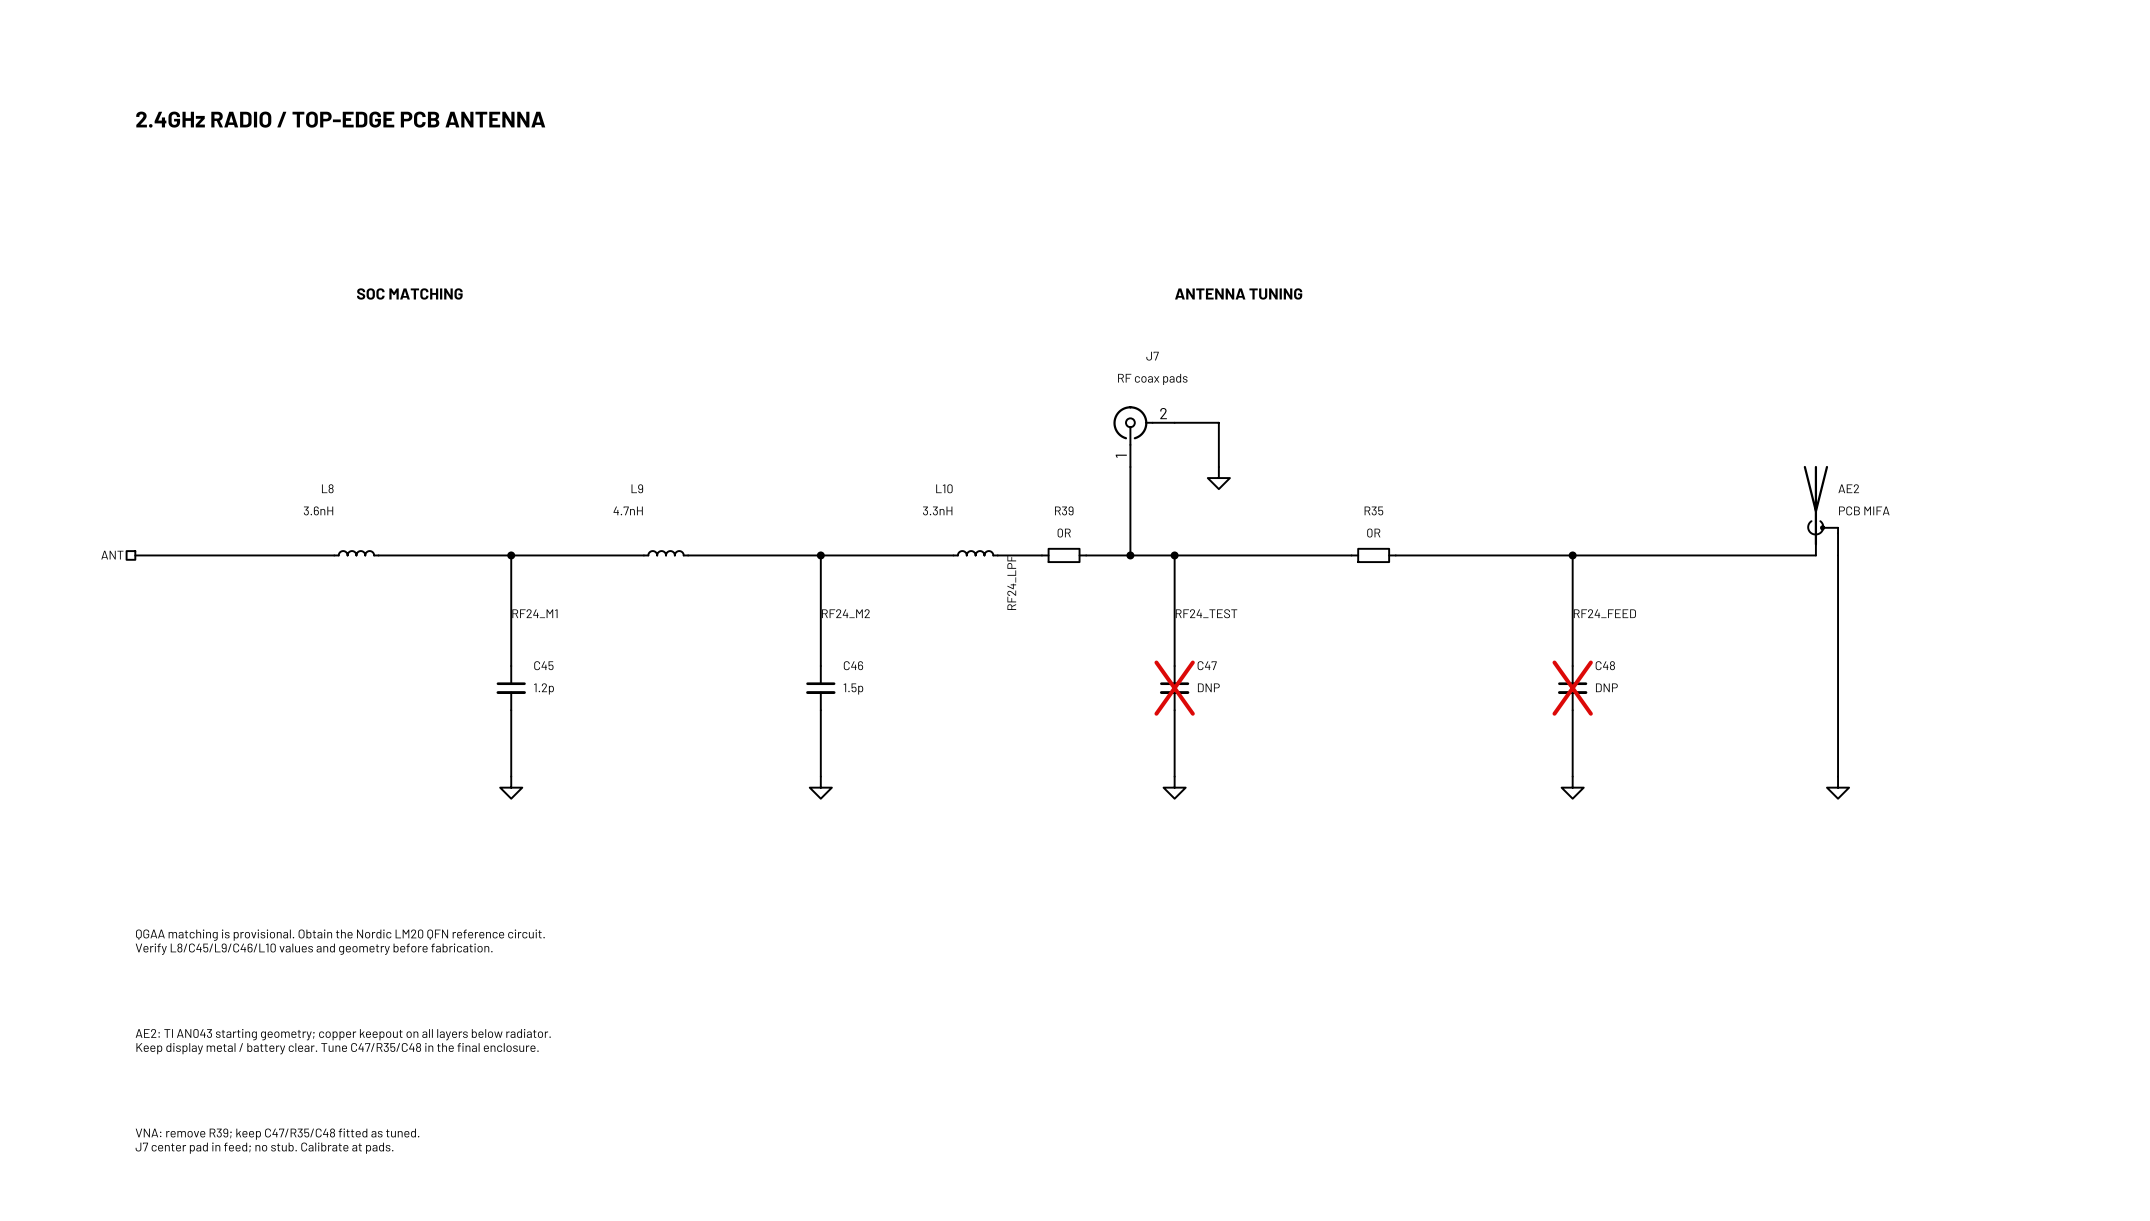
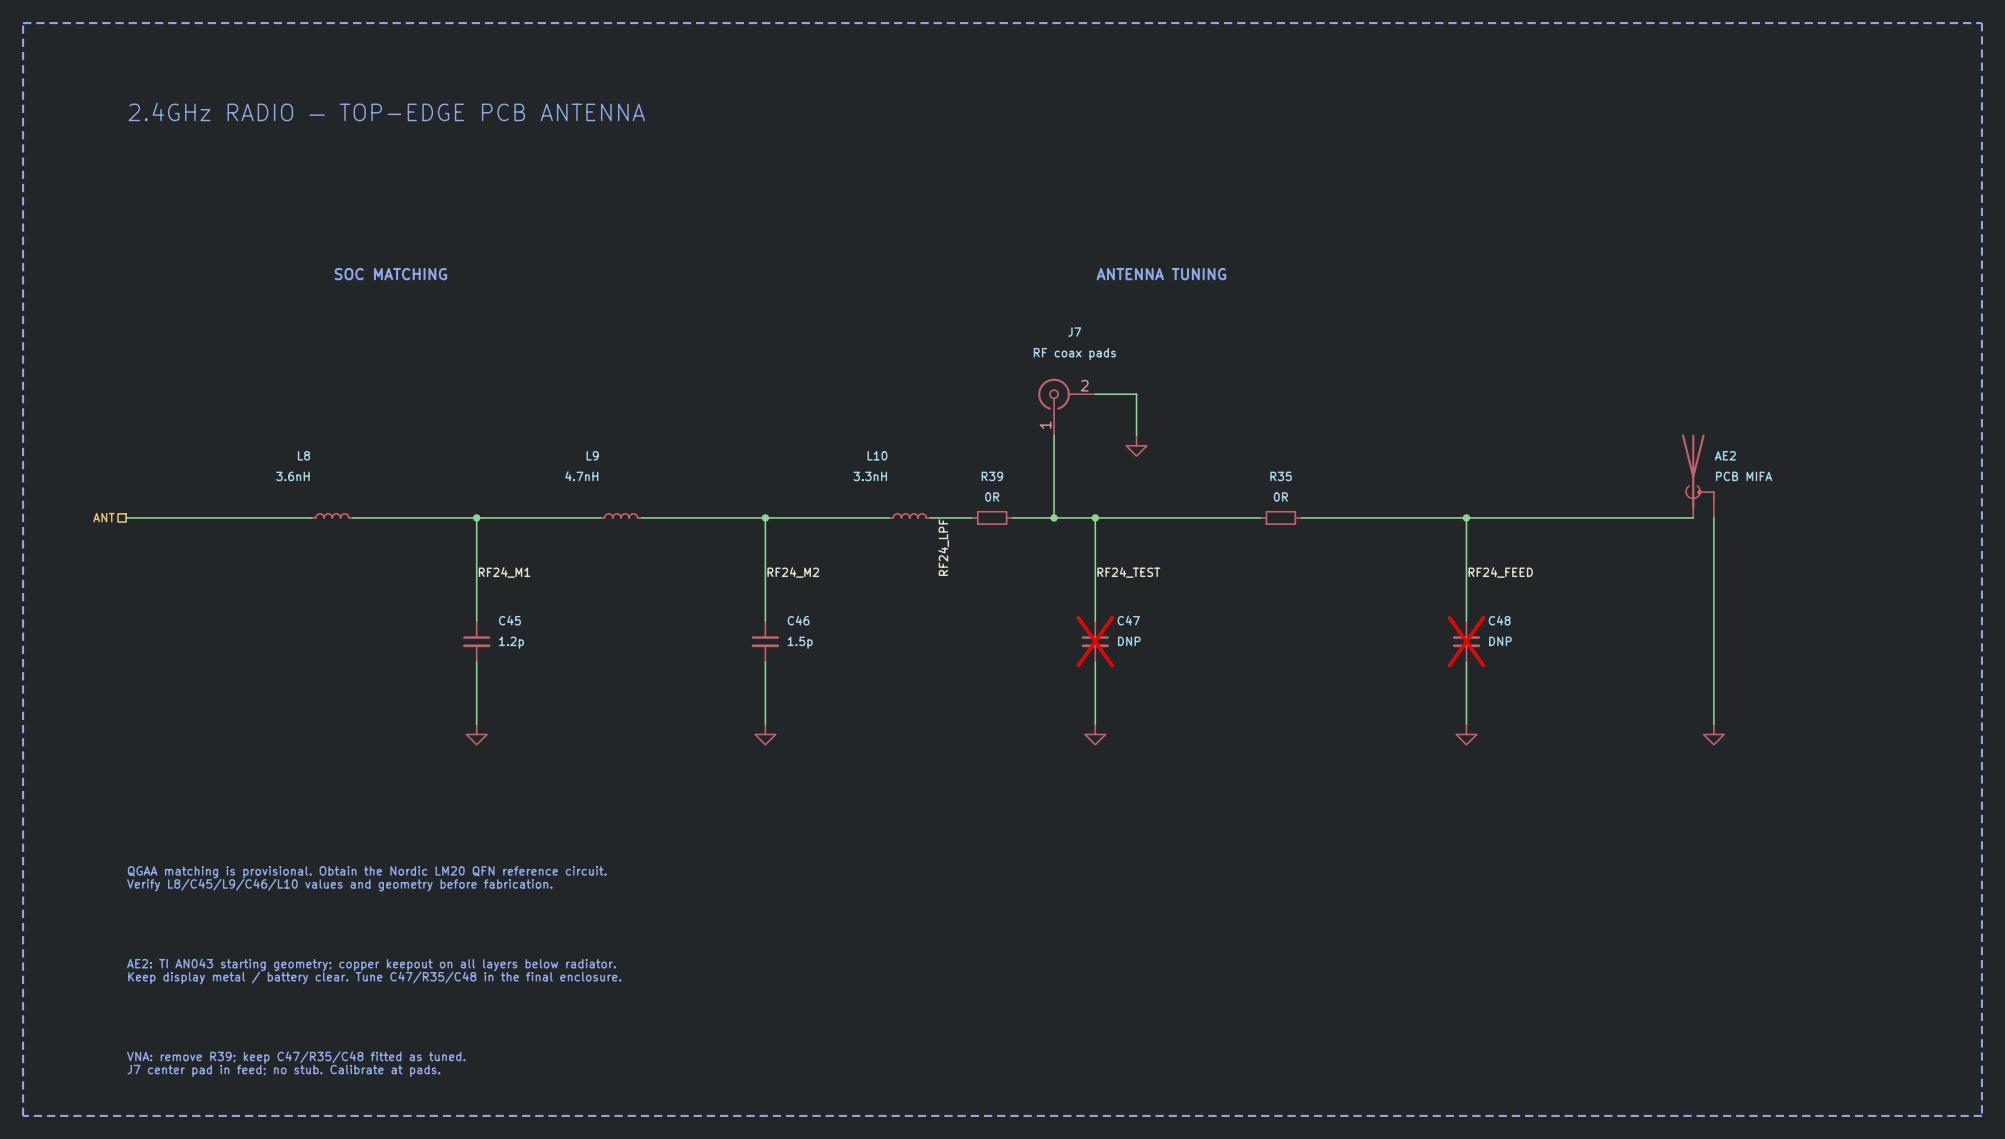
line: none -> (23, 23) (1981, 23) (1981, 1115) (23, 1115) (23, 23)
text: 2.4GHz RADIO / TOP-EDGE PCB ANTENNA (340, 119) -> 2.4GHz RADIO — TOP-EDGE PCB ANTENNA (386, 112)

